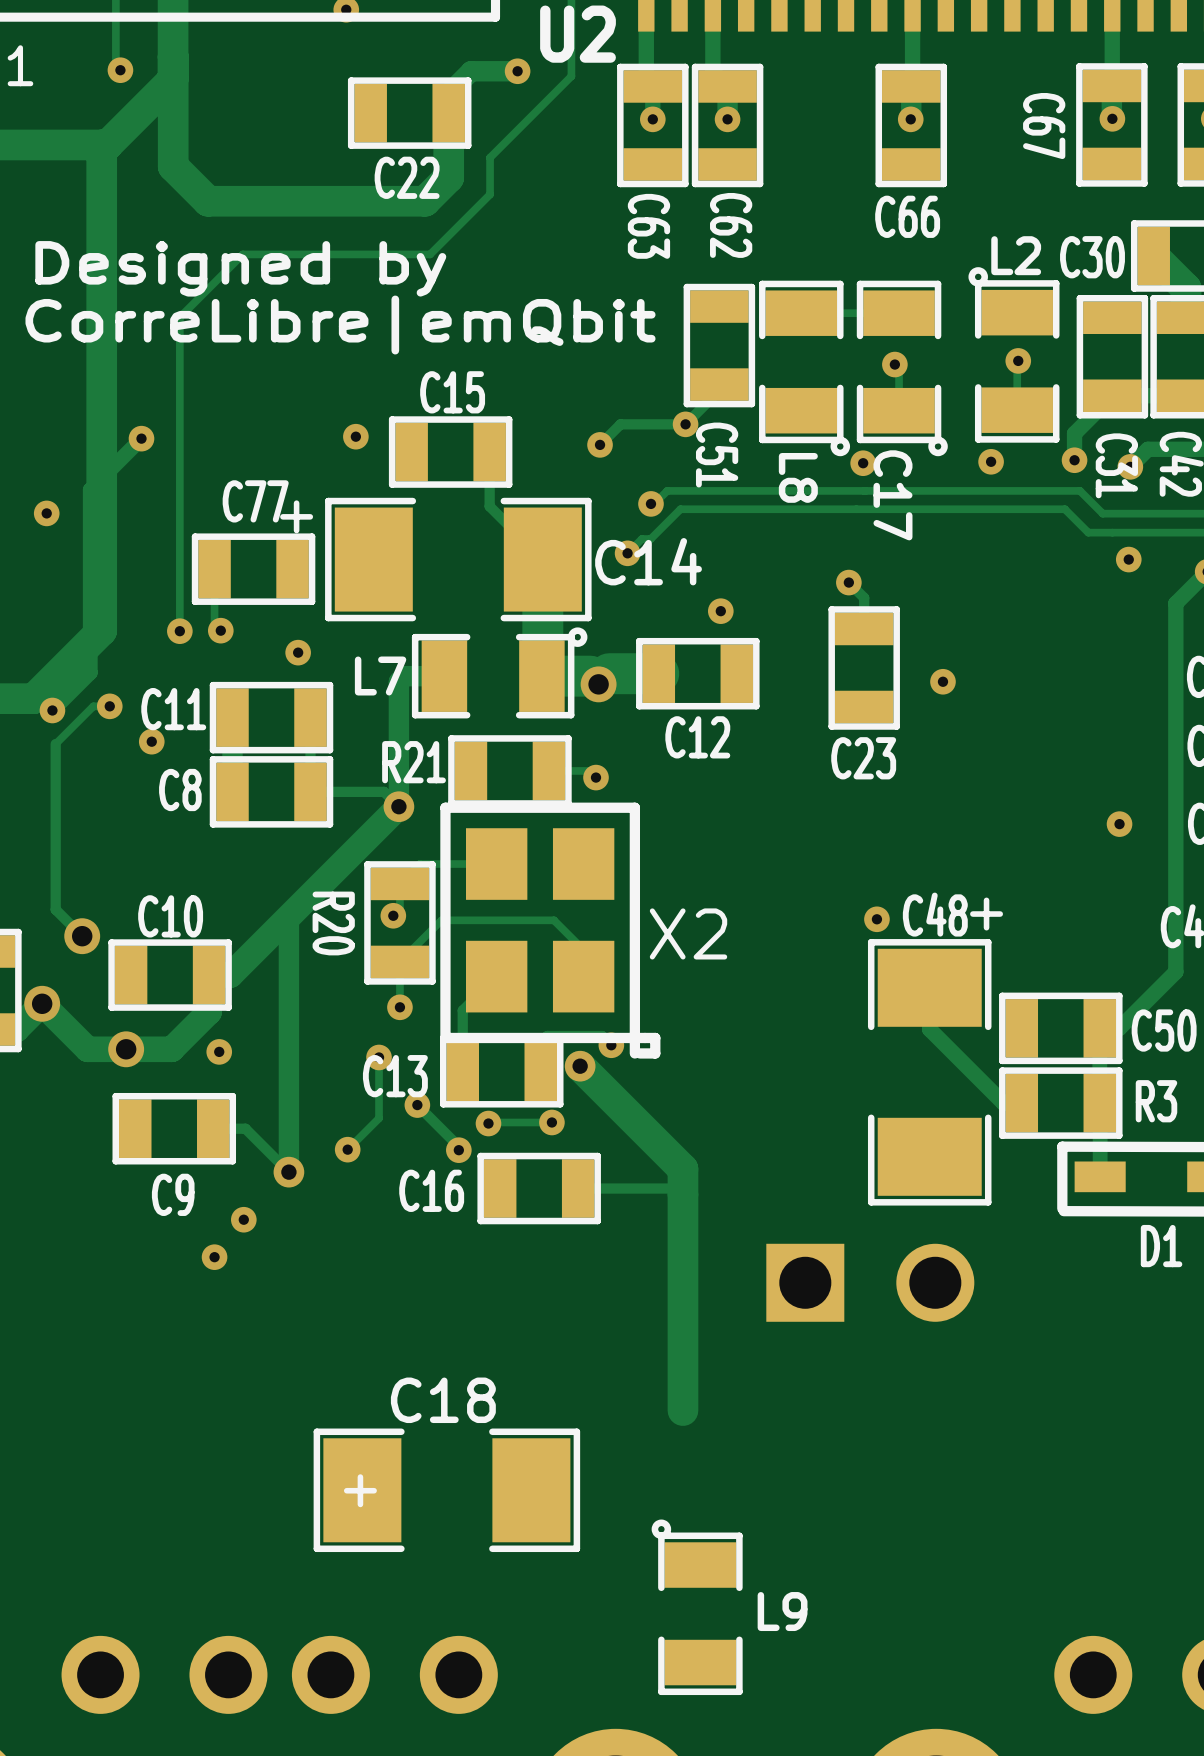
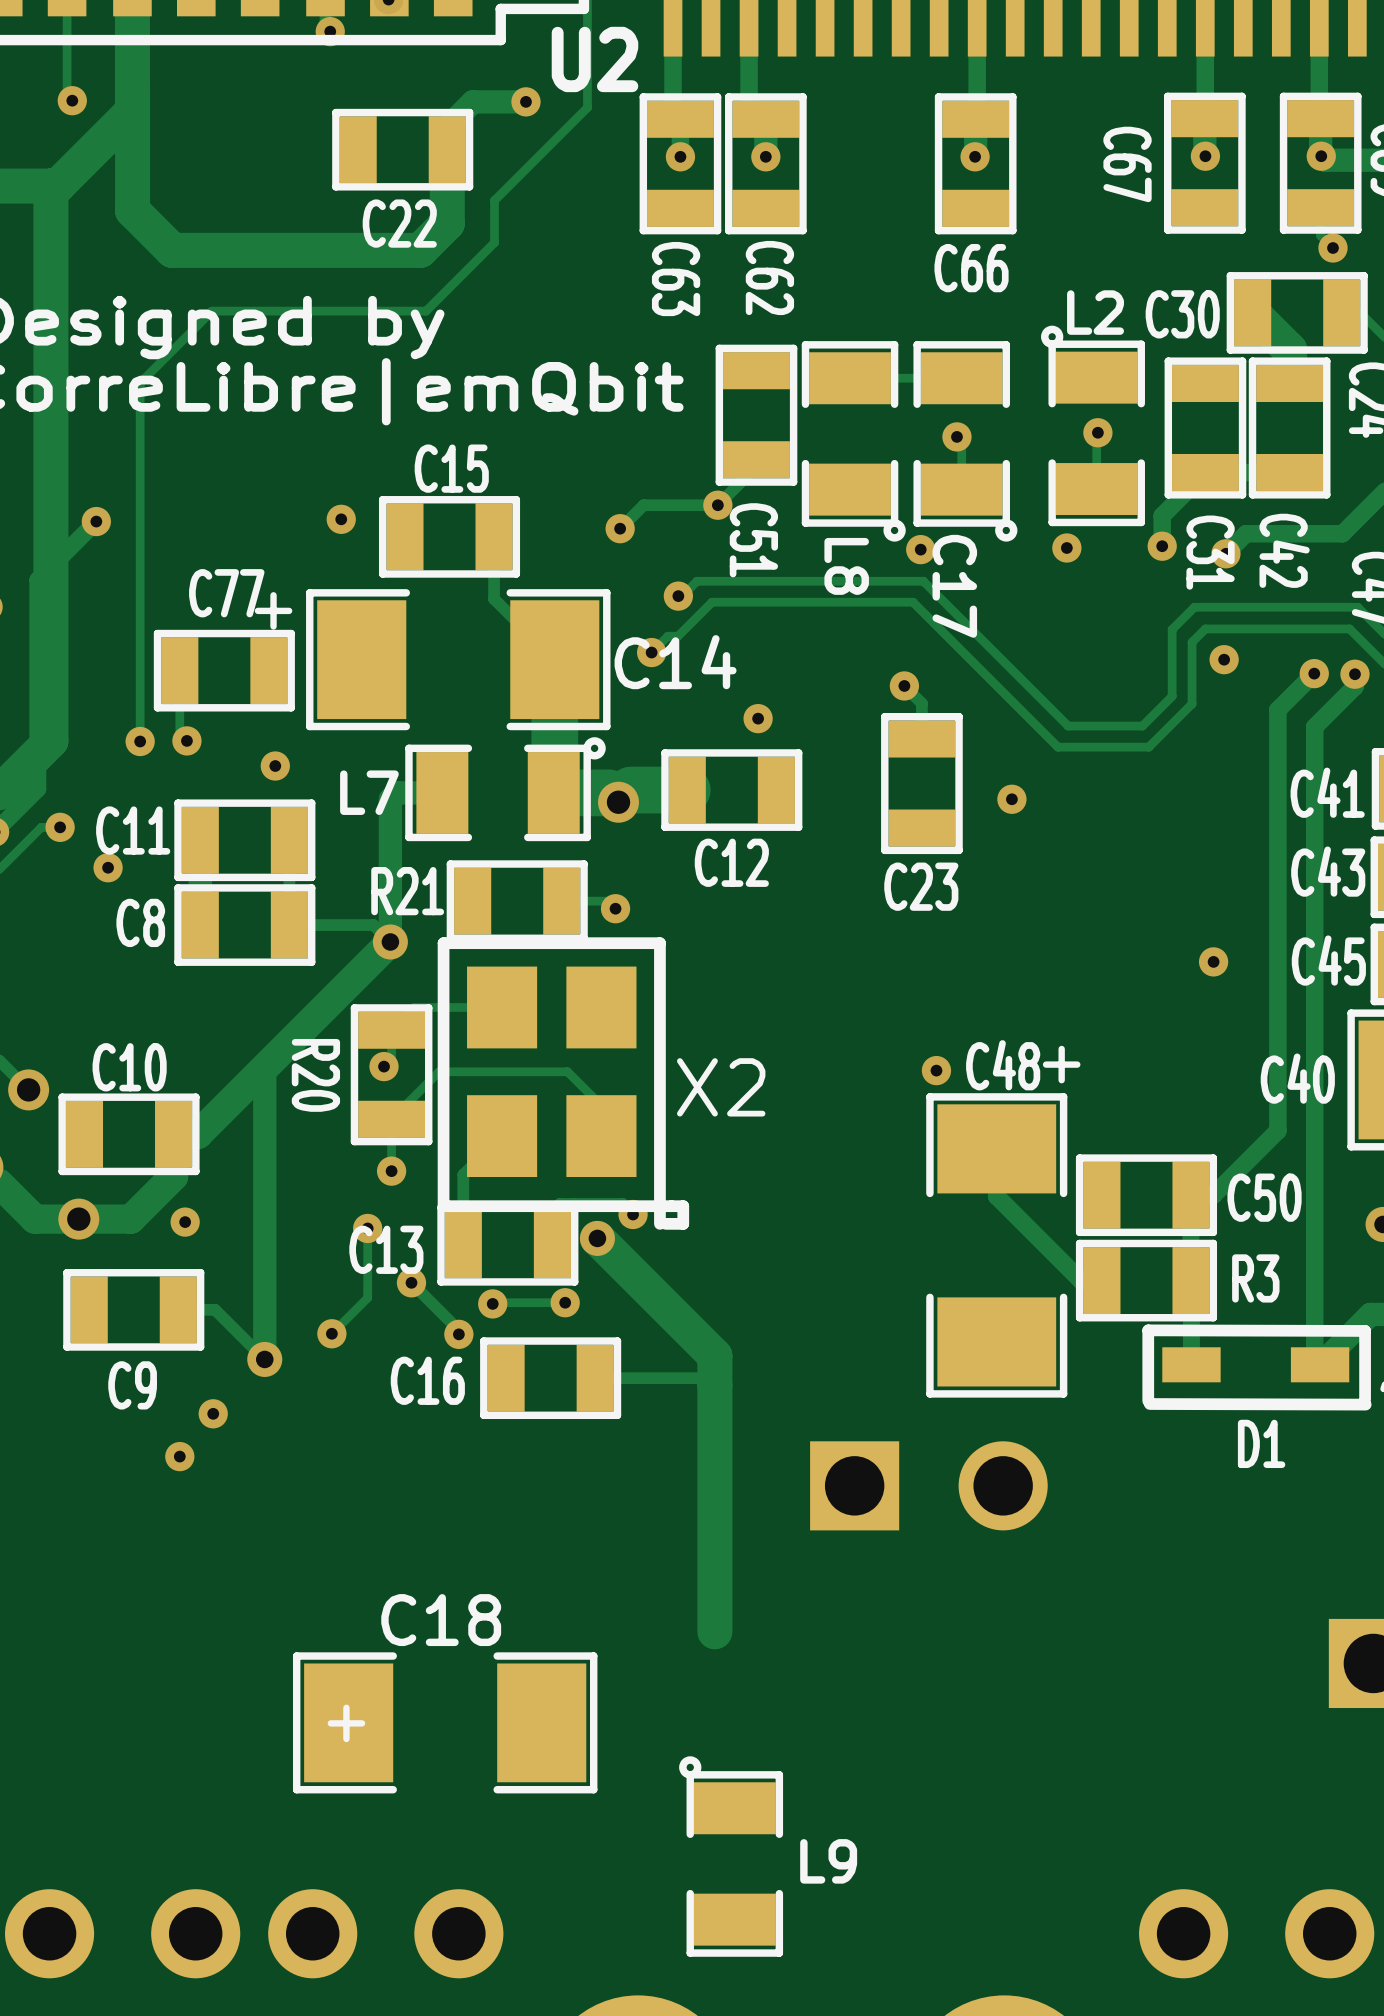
track: (865, 490) (1080, 490) (1102, 513) -> (923, 581) (1068, 726) (1142, 726) (1172, 696) (1172, 629) (1194, 607)
track: (856, 509) (1064, 509) (1088, 532) (1112, 532) -> (913, 602) (1057, 747) (1148, 747) (1192, 703) (1192, 642) (1205, 628)

